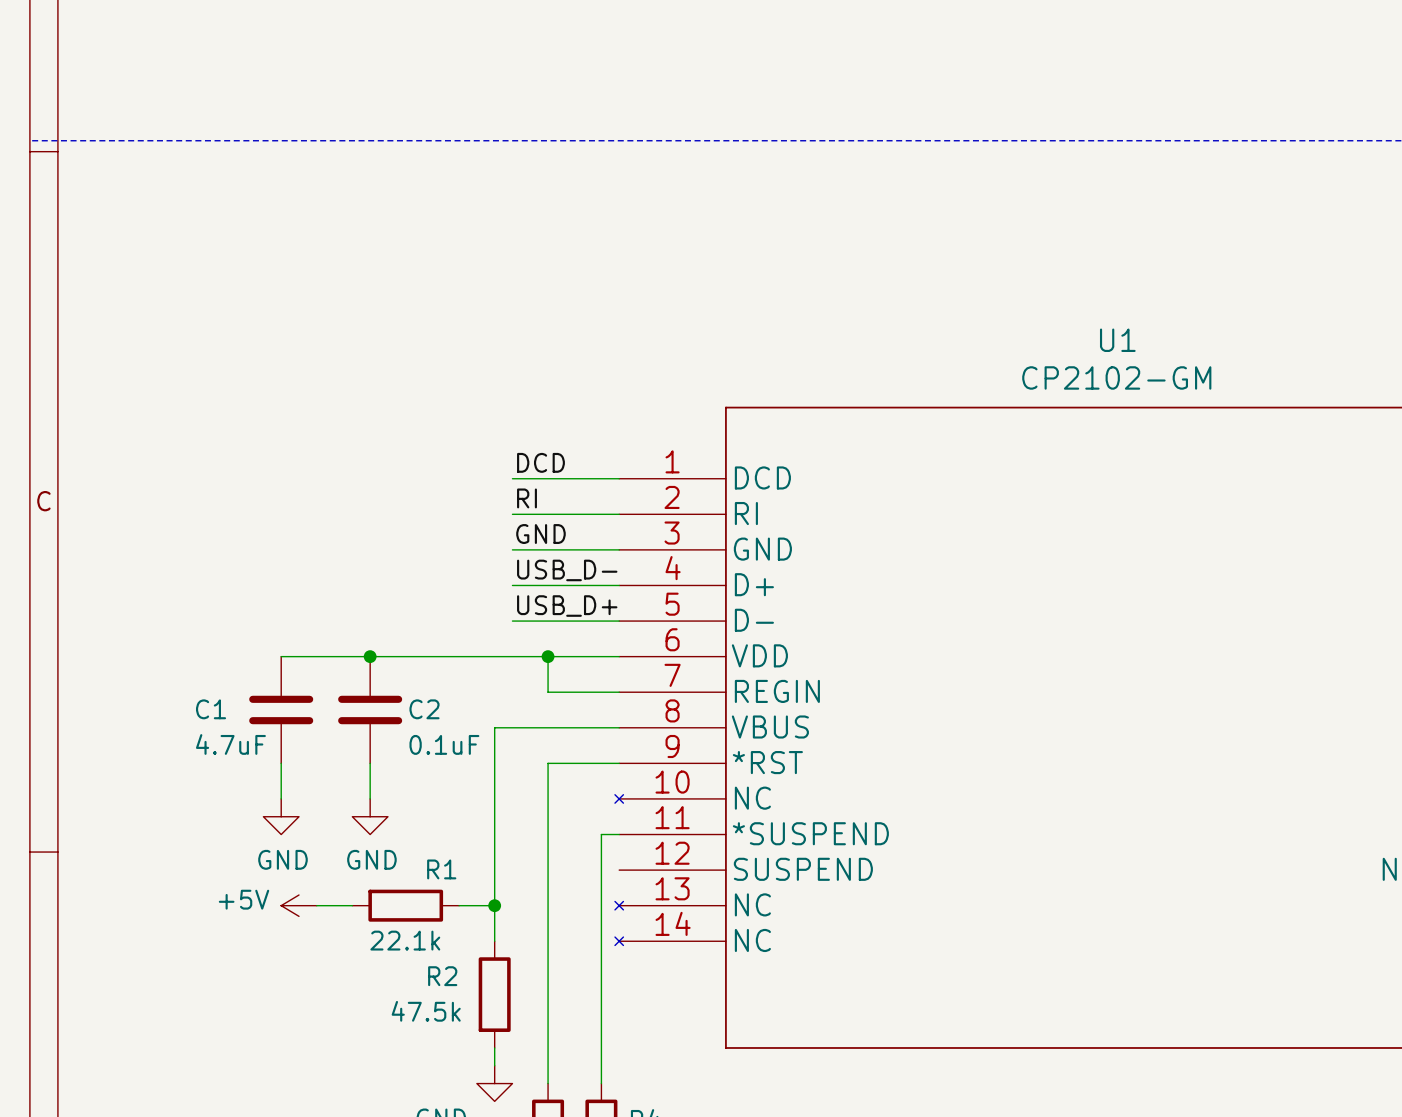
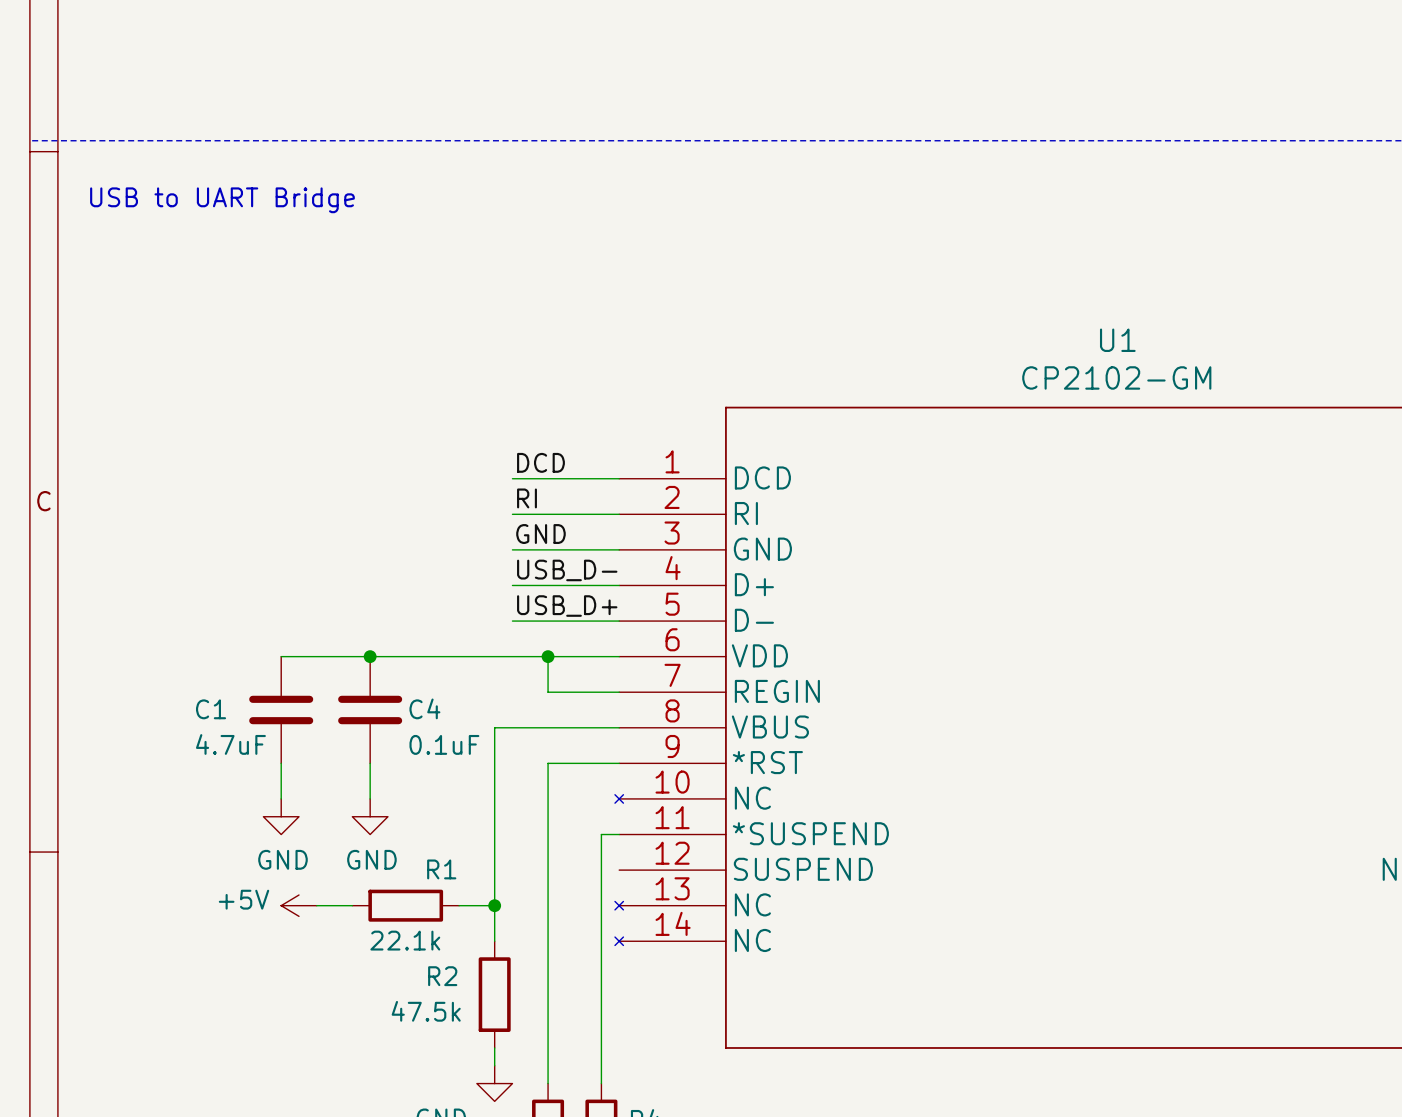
text: none -> USB to UART Bridge (222, 200)
C2 name: C2 (424, 709) -> C4 (424, 708)

